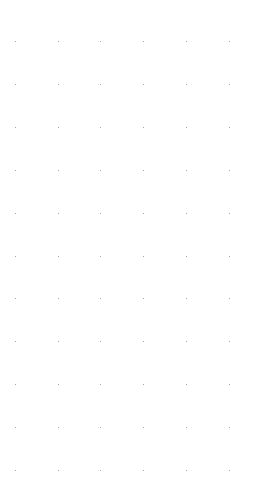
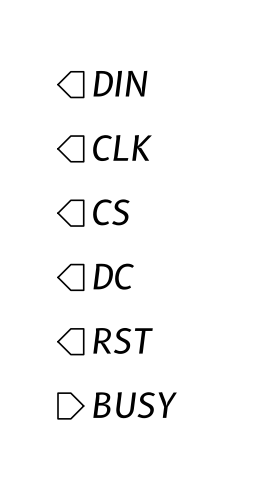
hierarchical label: none -> DIN (120, 83)
hierarchical label: none -> CLK (122, 148)
hierarchical label: none -> CS (111, 212)
hierarchical label: none -> DC (113, 276)
hierarchical label: none -> RST (123, 340)
hierarchical label: none -> BUSY (135, 405)

